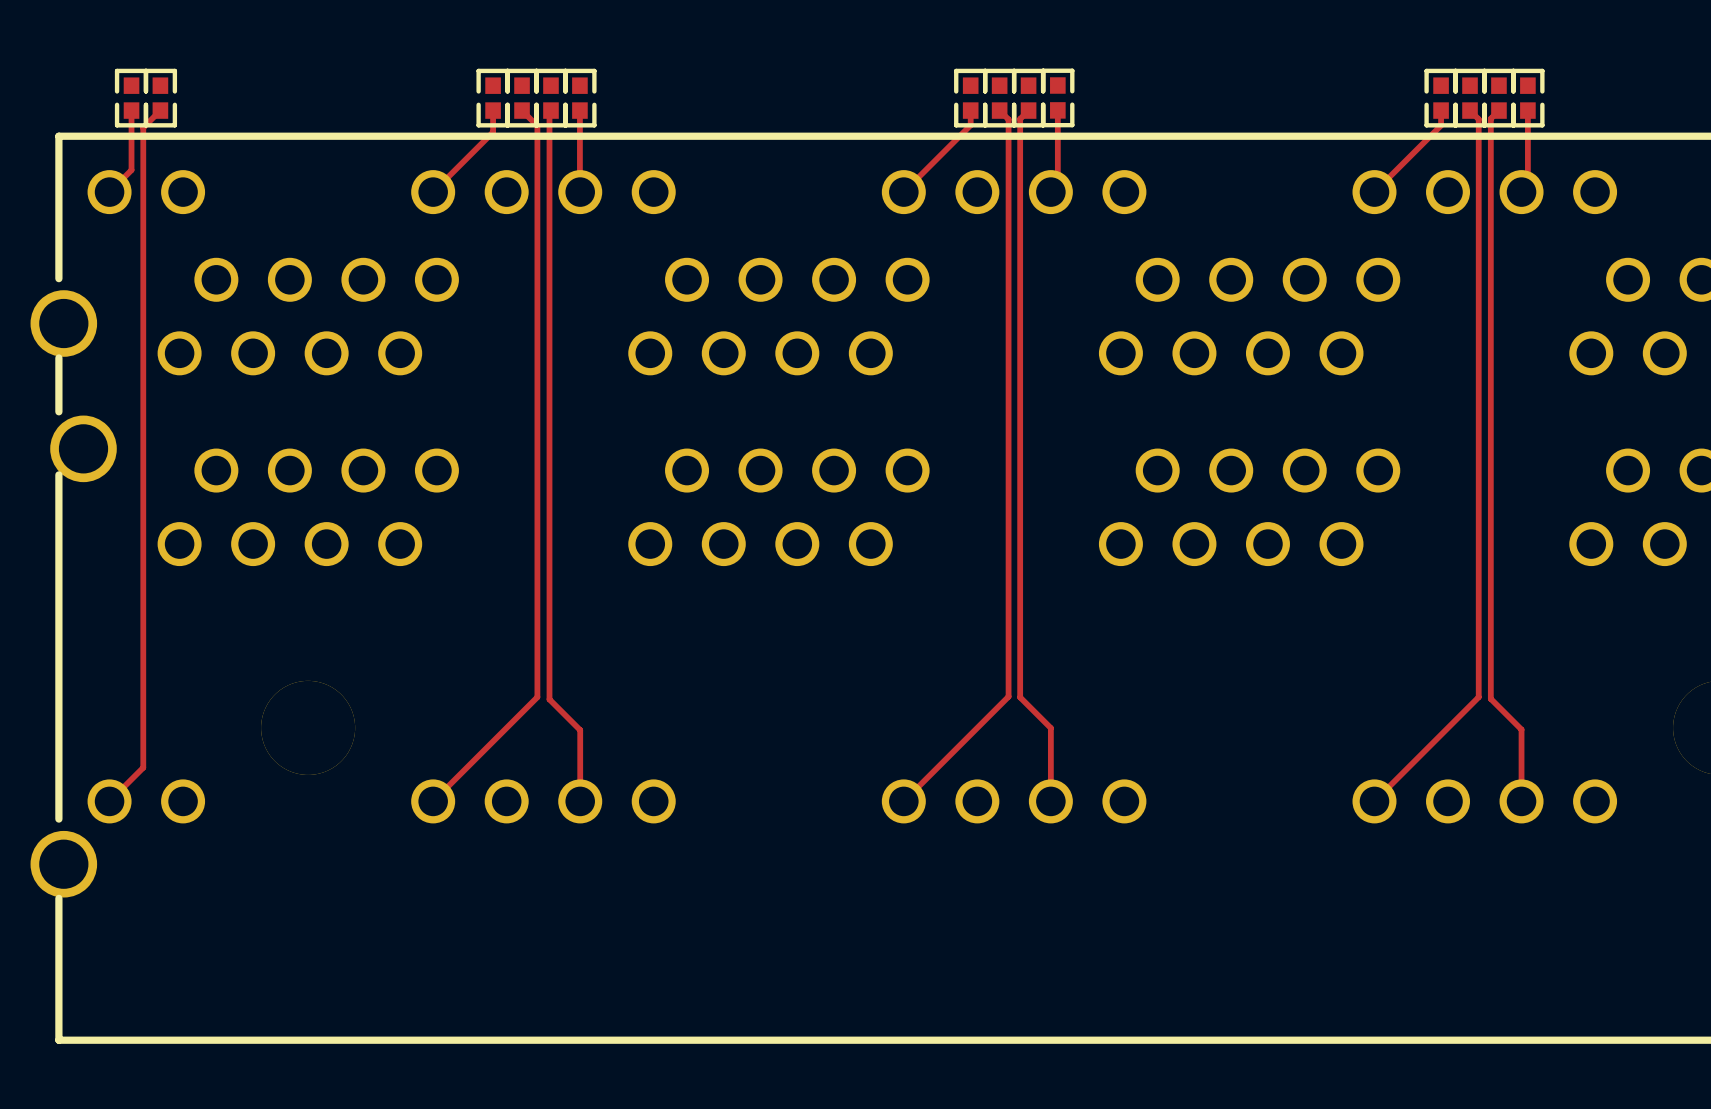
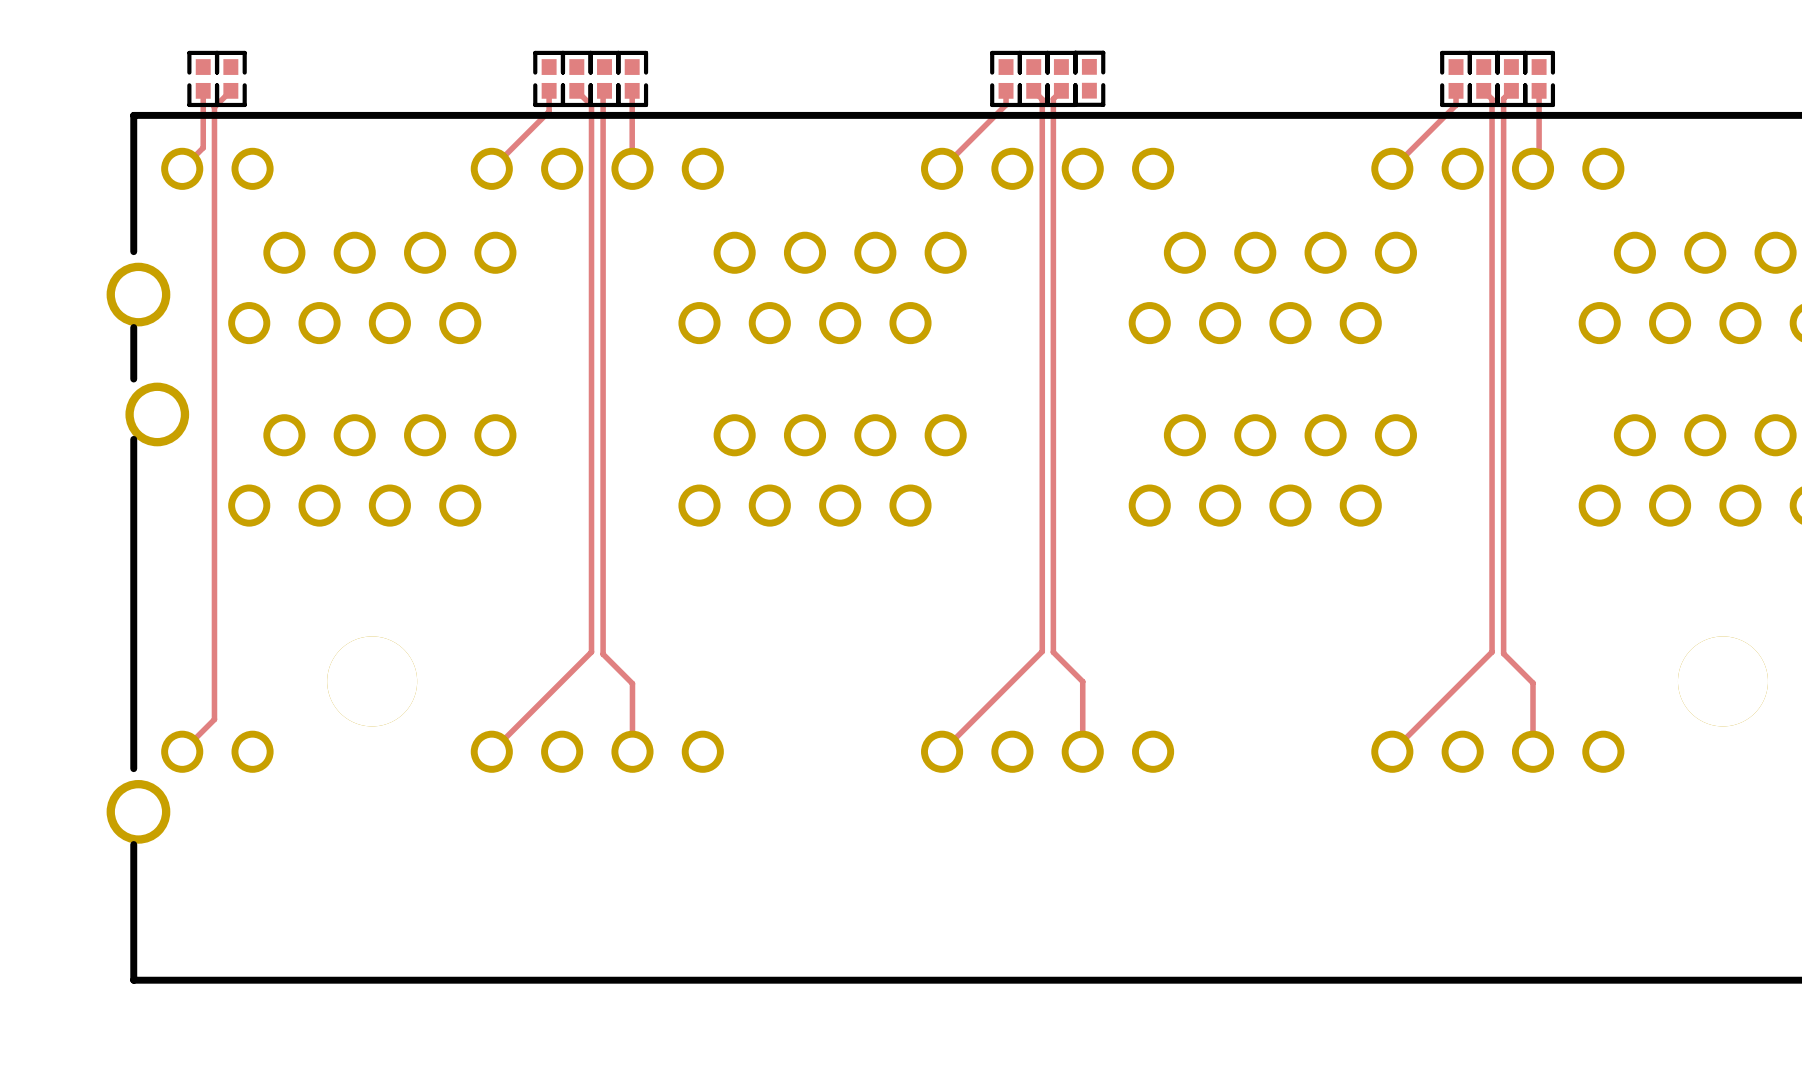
top track: (1057, 110) (1057, 185) (1050, 192) -> none

